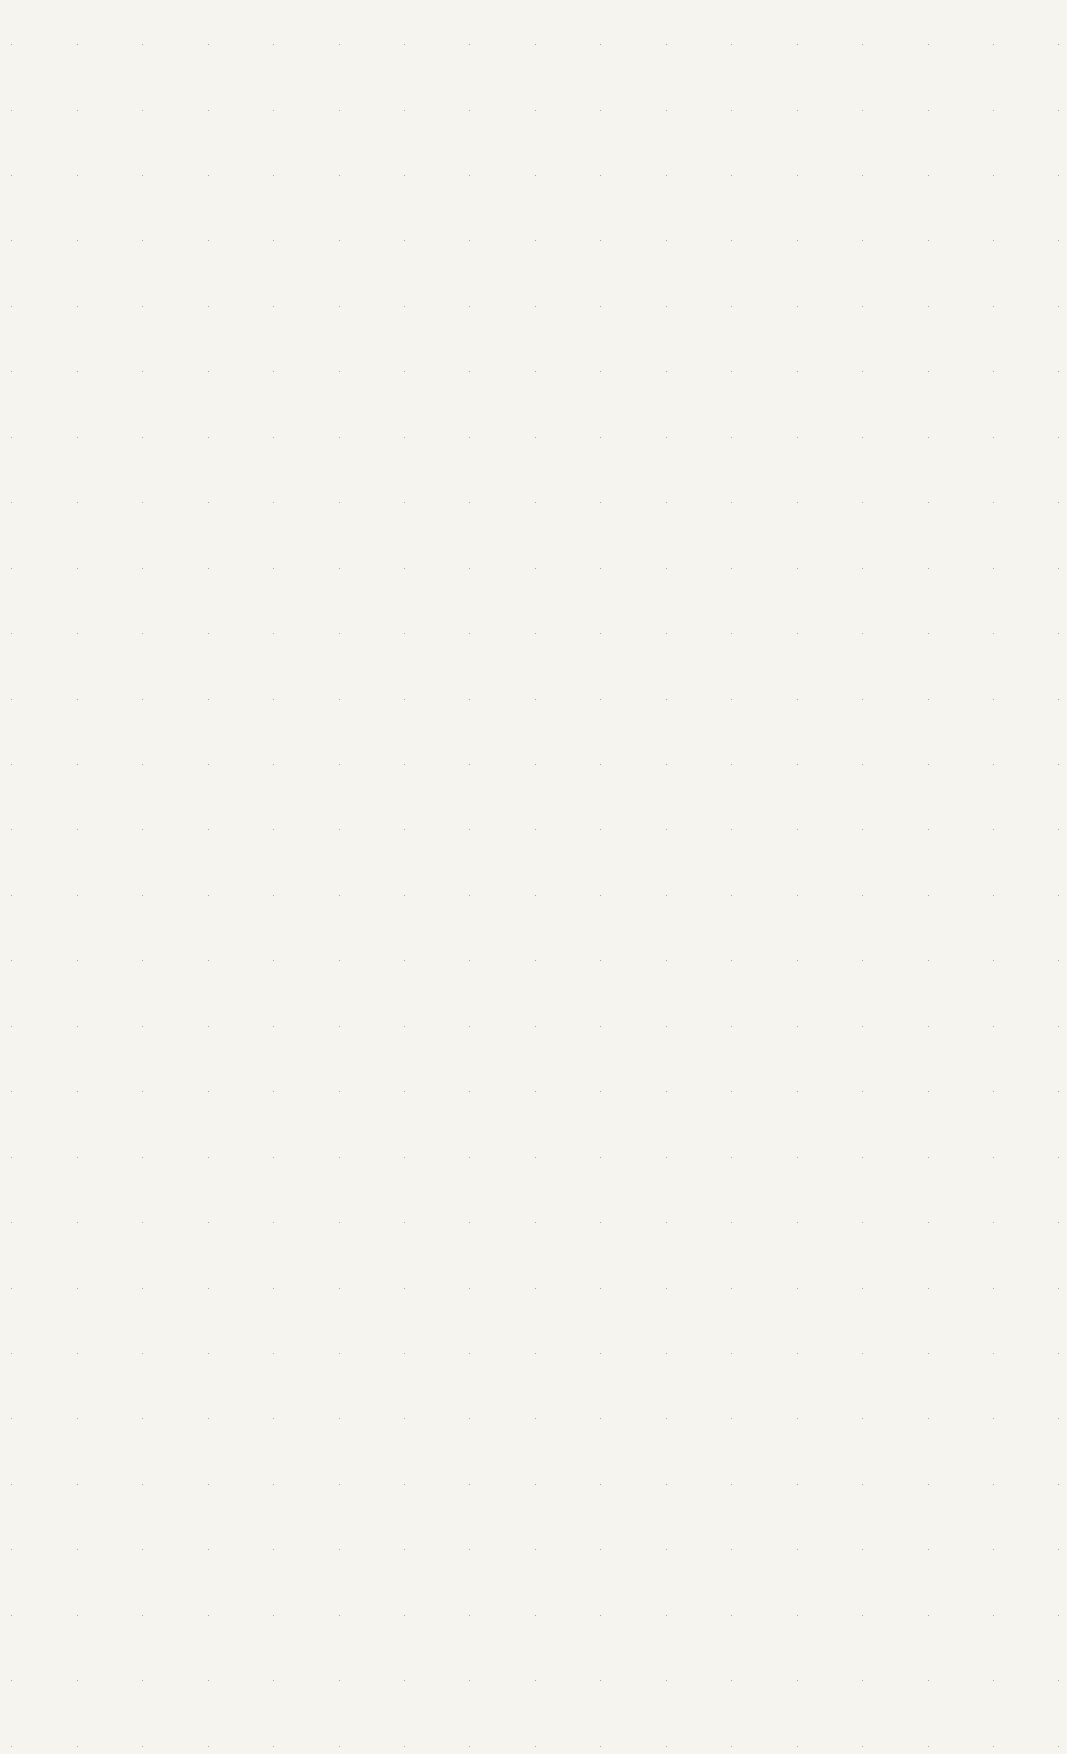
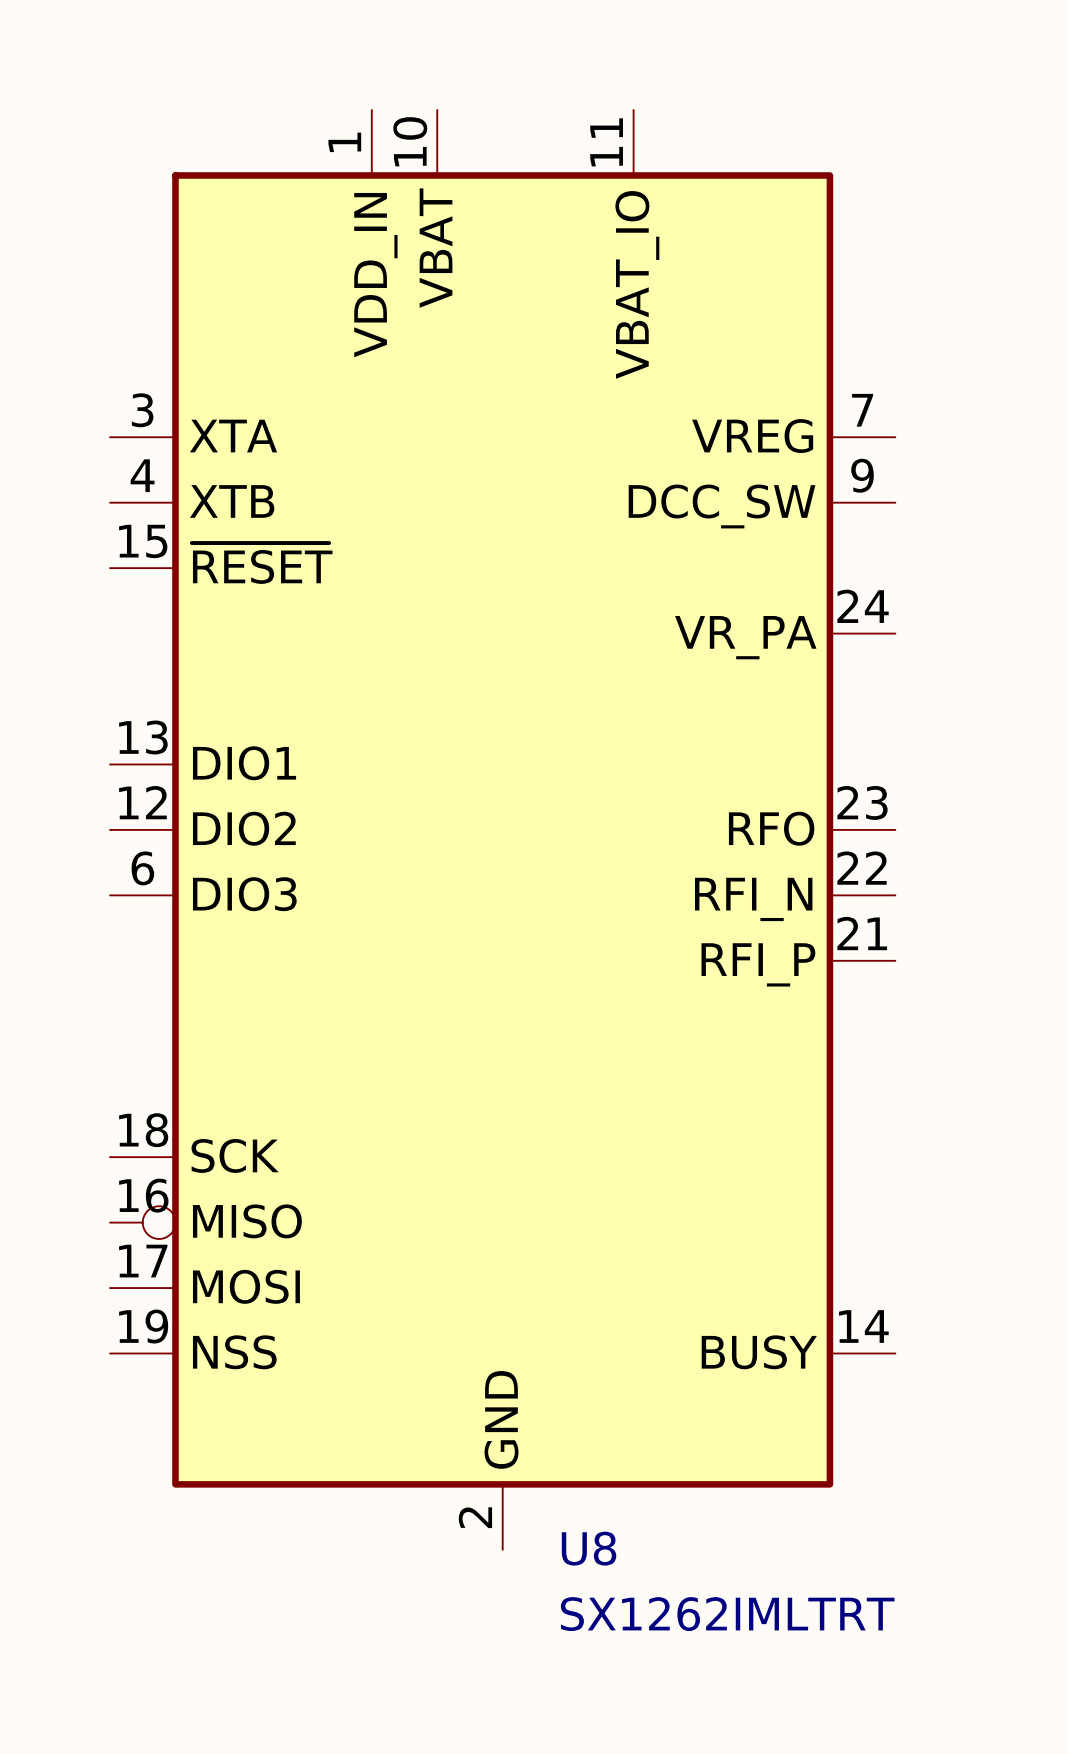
U8: none -> SX1262IMLTRT (502, 829)

